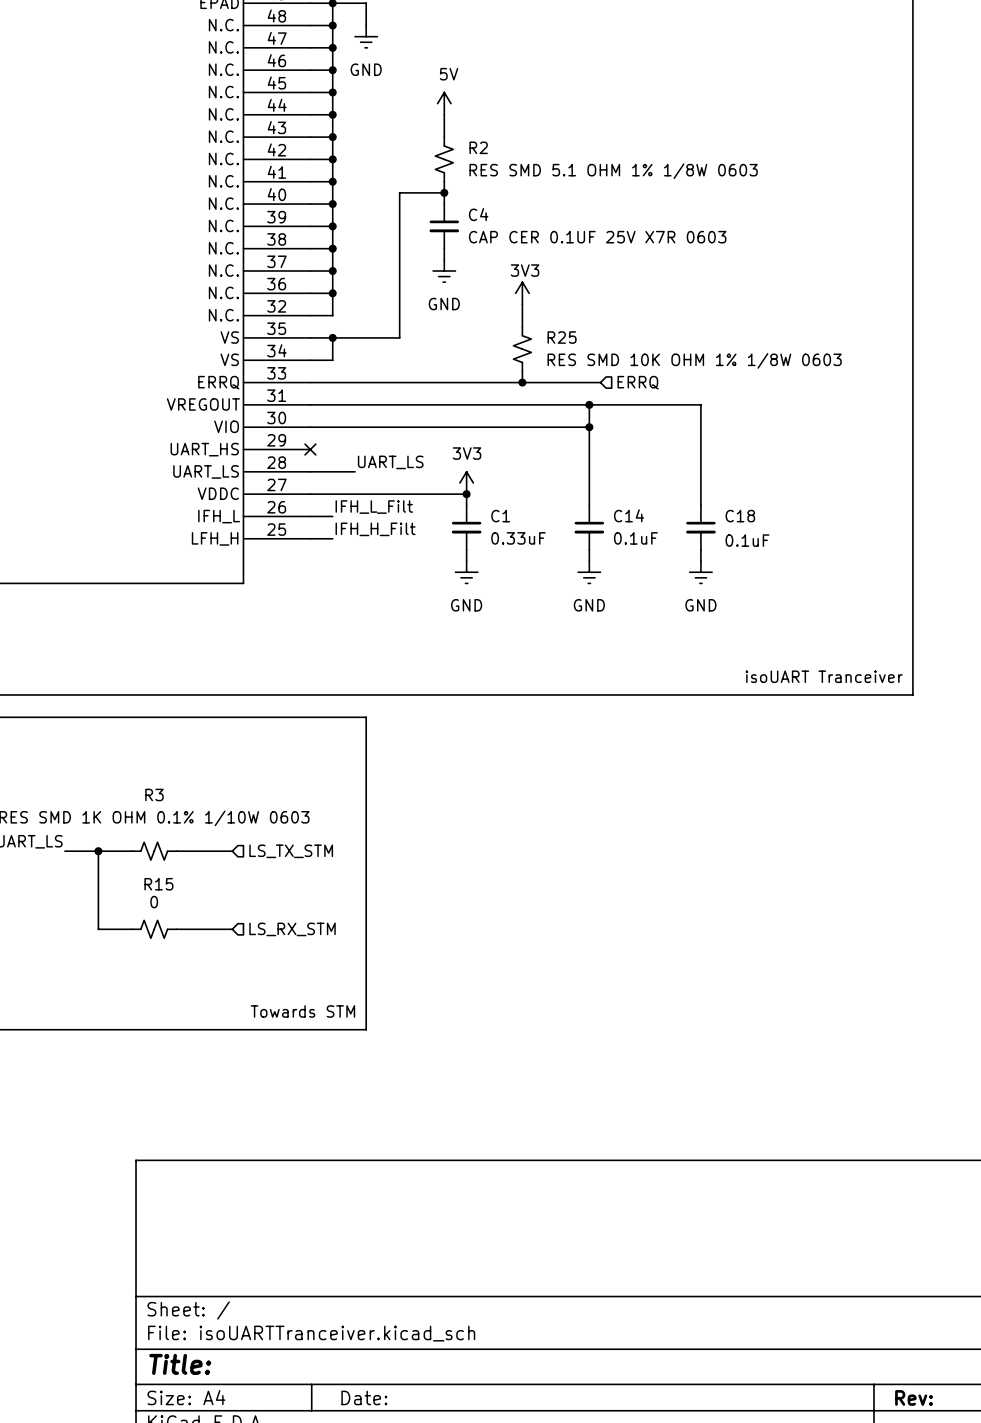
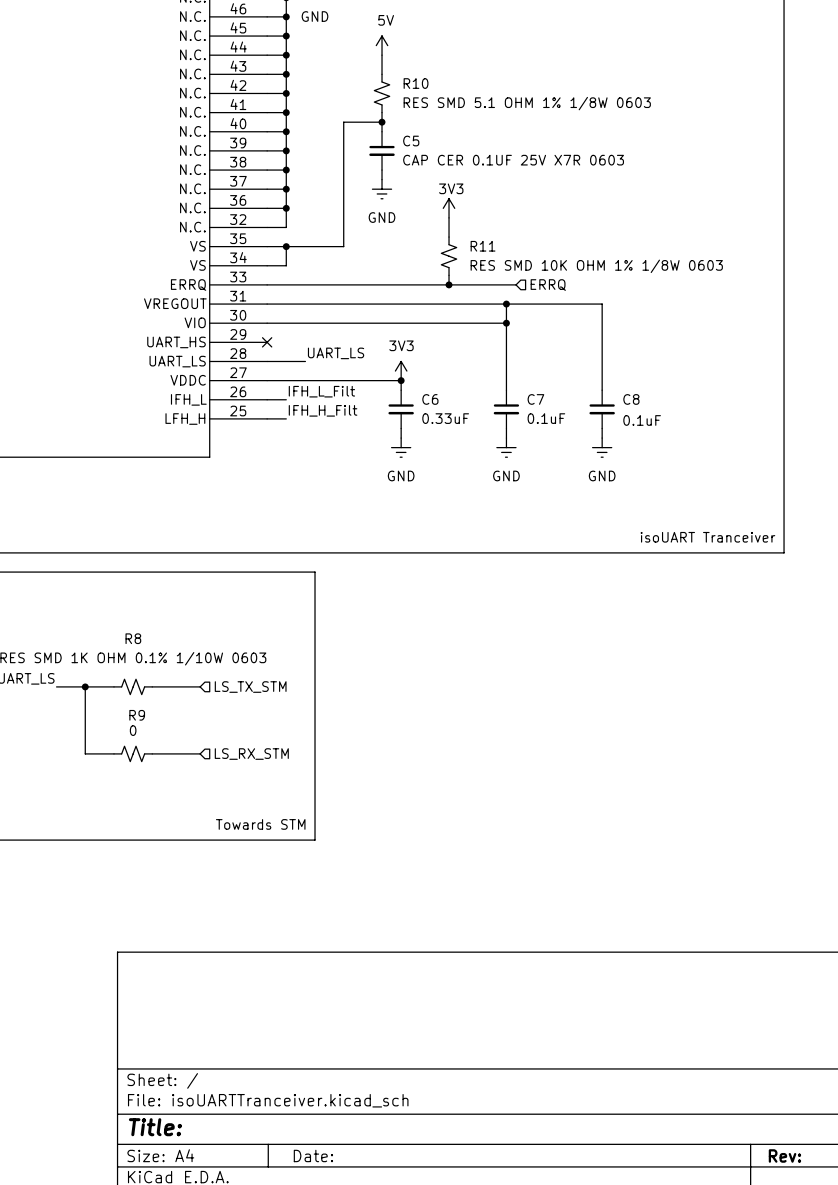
R2 name: R2 (478, 147) -> R10 (416, 83)
C4 name: C4 (478, 214) -> C5 (411, 141)
R25 name: R25 (562, 337) -> R11 (483, 246)
C14 name: C14 (629, 515) -> C7 (535, 399)
C1 name: C1 (500, 516) -> C6 (430, 399)
C18 name: C18 (740, 516) -> C8 (631, 399)
R3 name: R3 (154, 794) -> R8 (133, 638)
R15 name: R15 (158, 884) -> R9 (137, 715)

